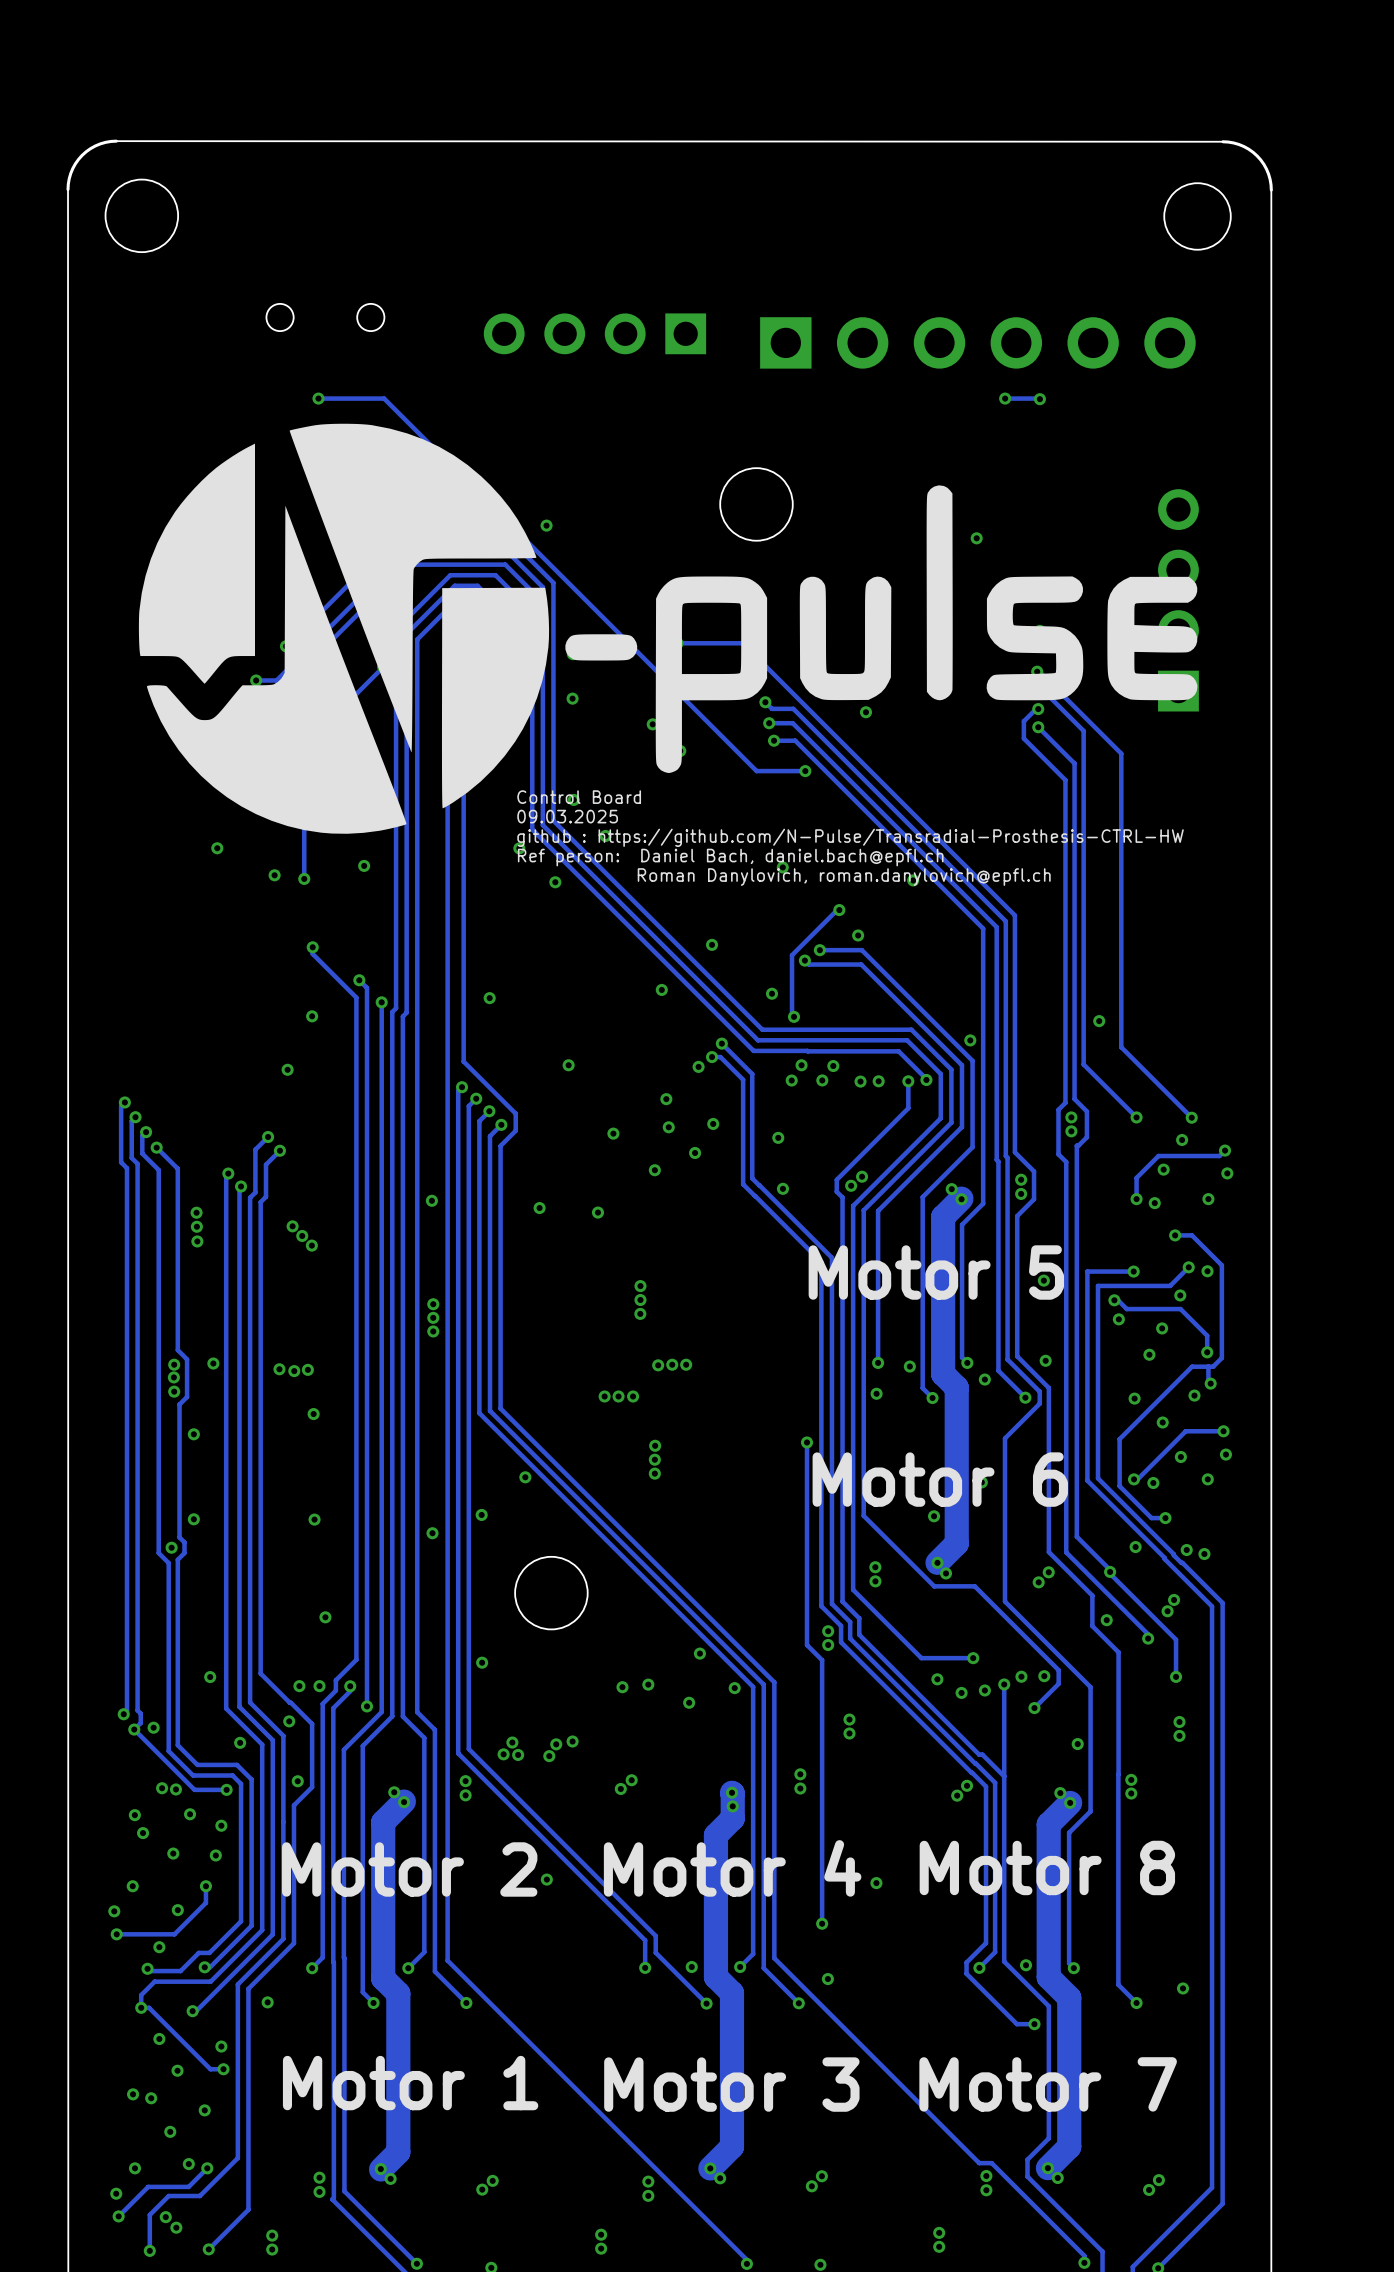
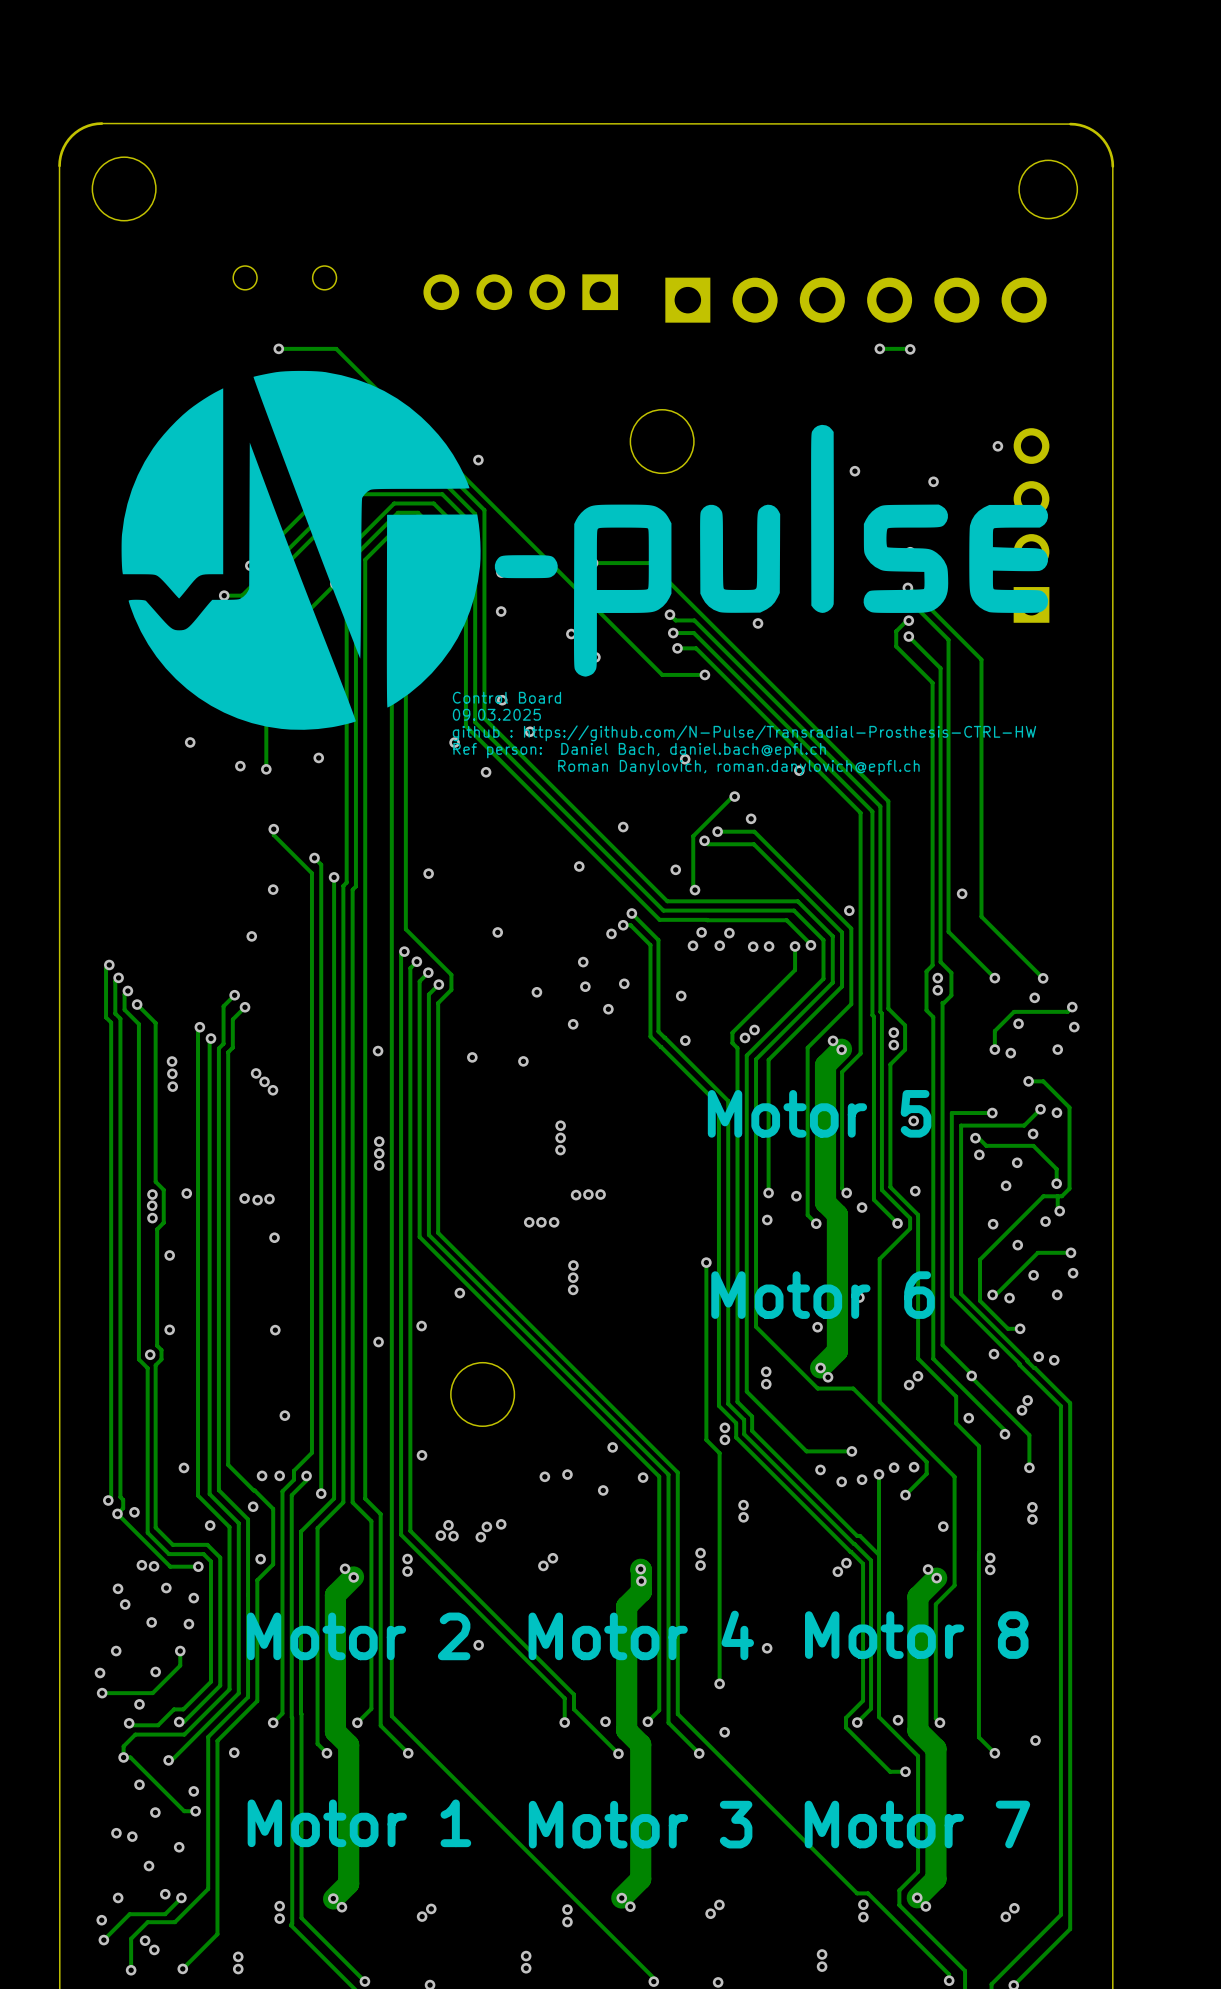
via: none -> (997, 446)
via: none -> (933, 481)

